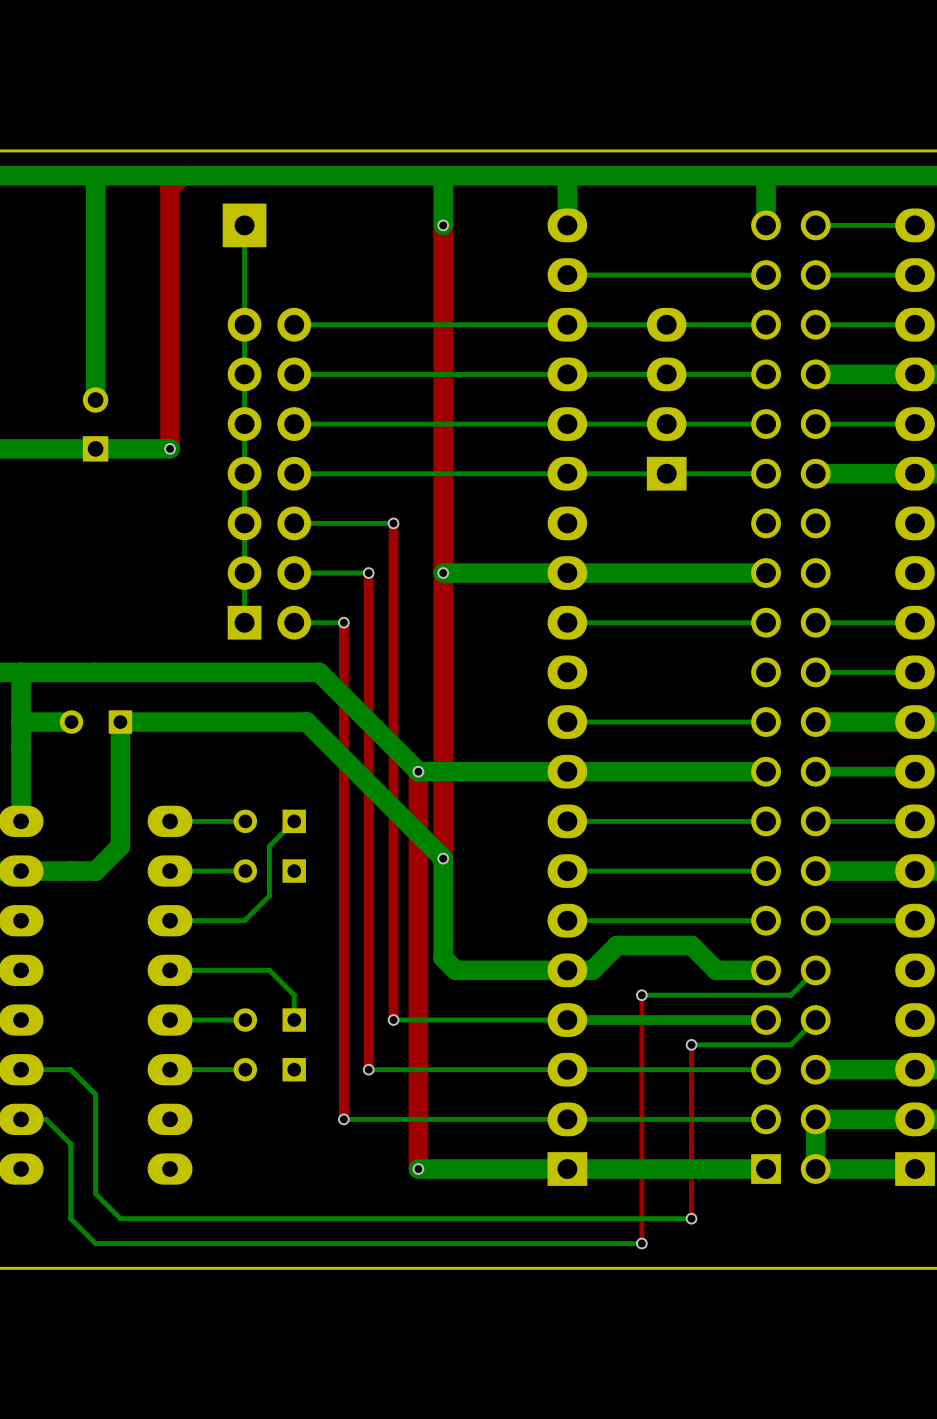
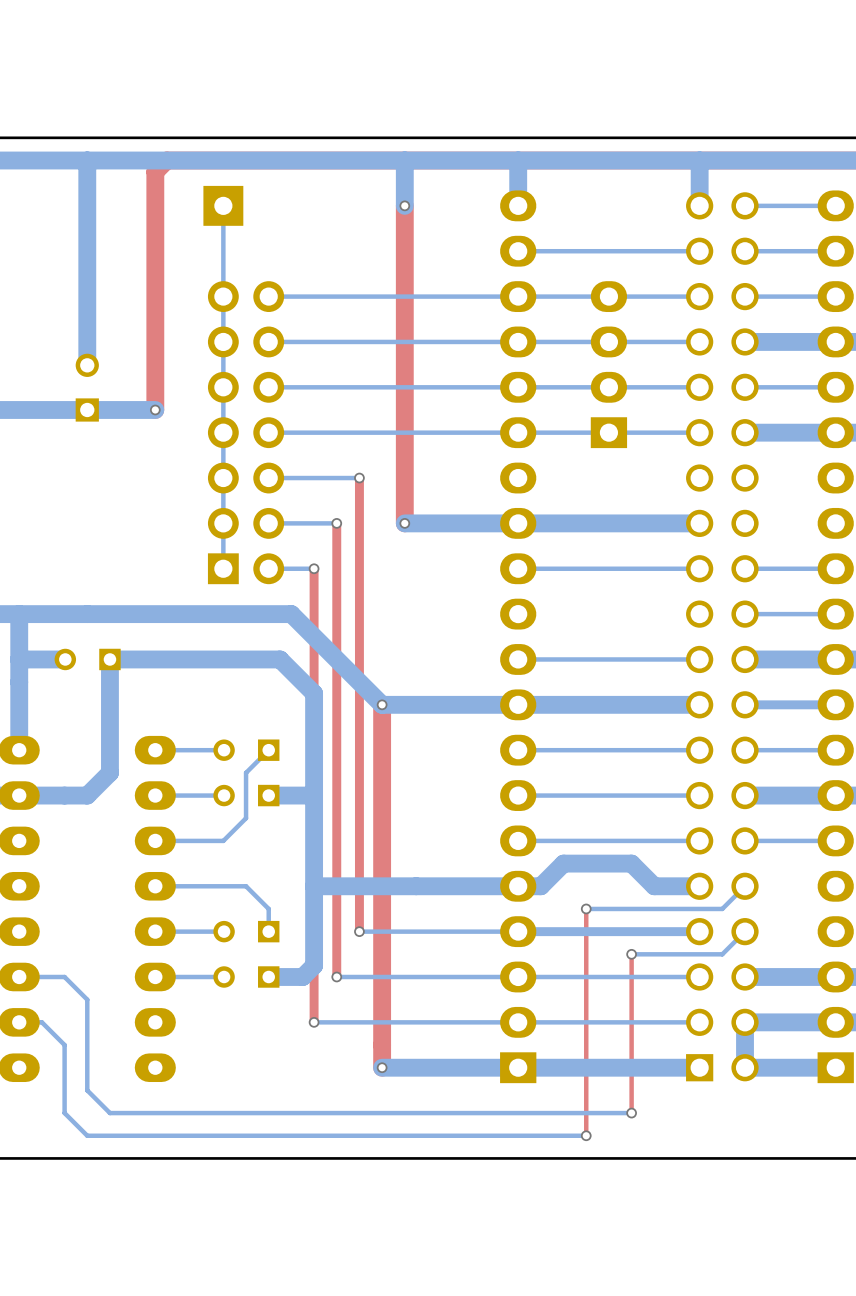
top track: (443, 573) (443, 858) -> none
bottom track: (343, 759) (443, 858) (443, 957) (455, 970) -> (314, 693) (314, 965) (302, 976) (268, 976)
via: (443, 858) -> none
bottom track: none -> (314, 795) (268, 795)
bottom track: none -> (416, 886) (314, 886)

